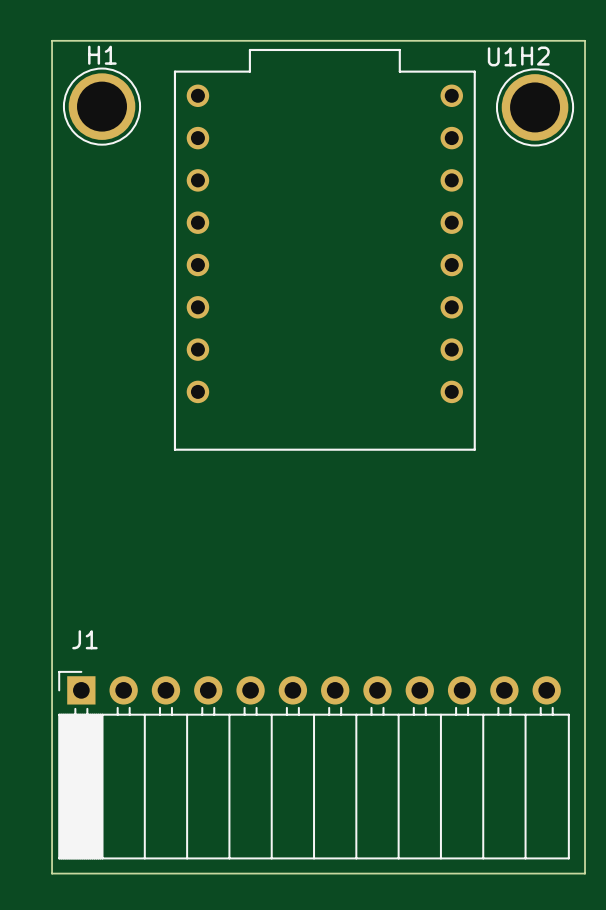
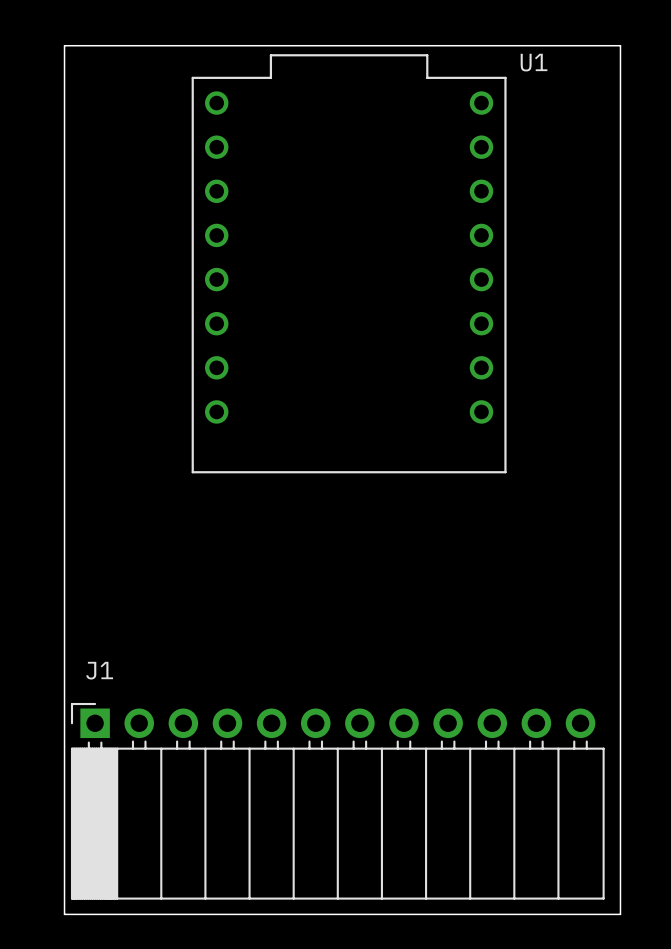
H1: (102, 106) -> none
H2: (535, 107) -> none

